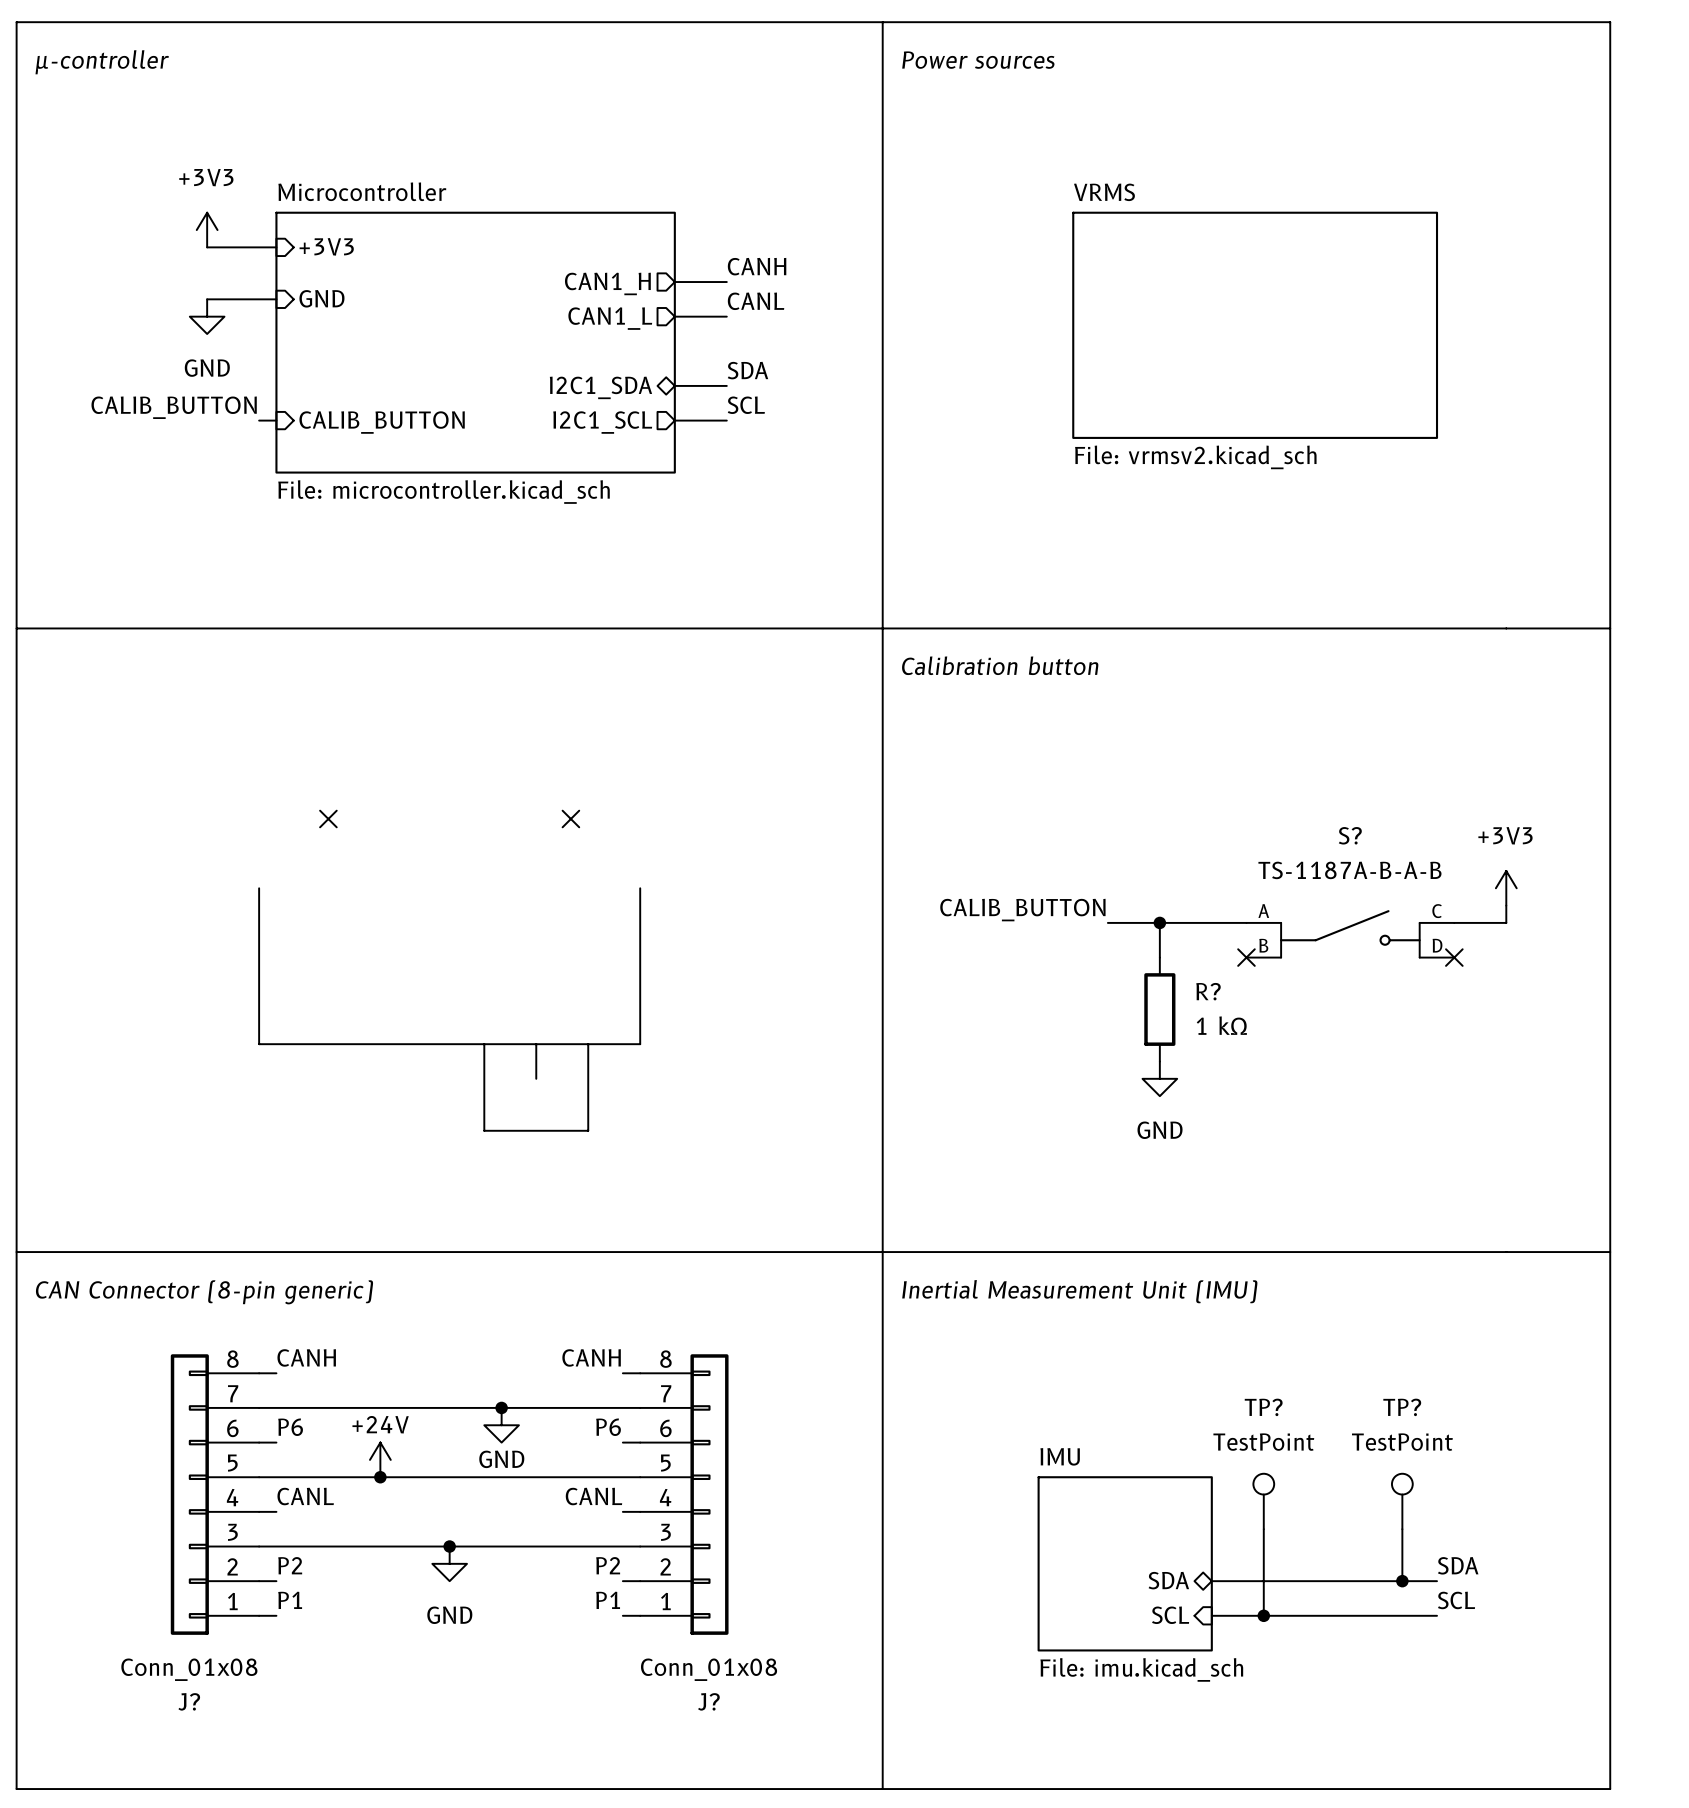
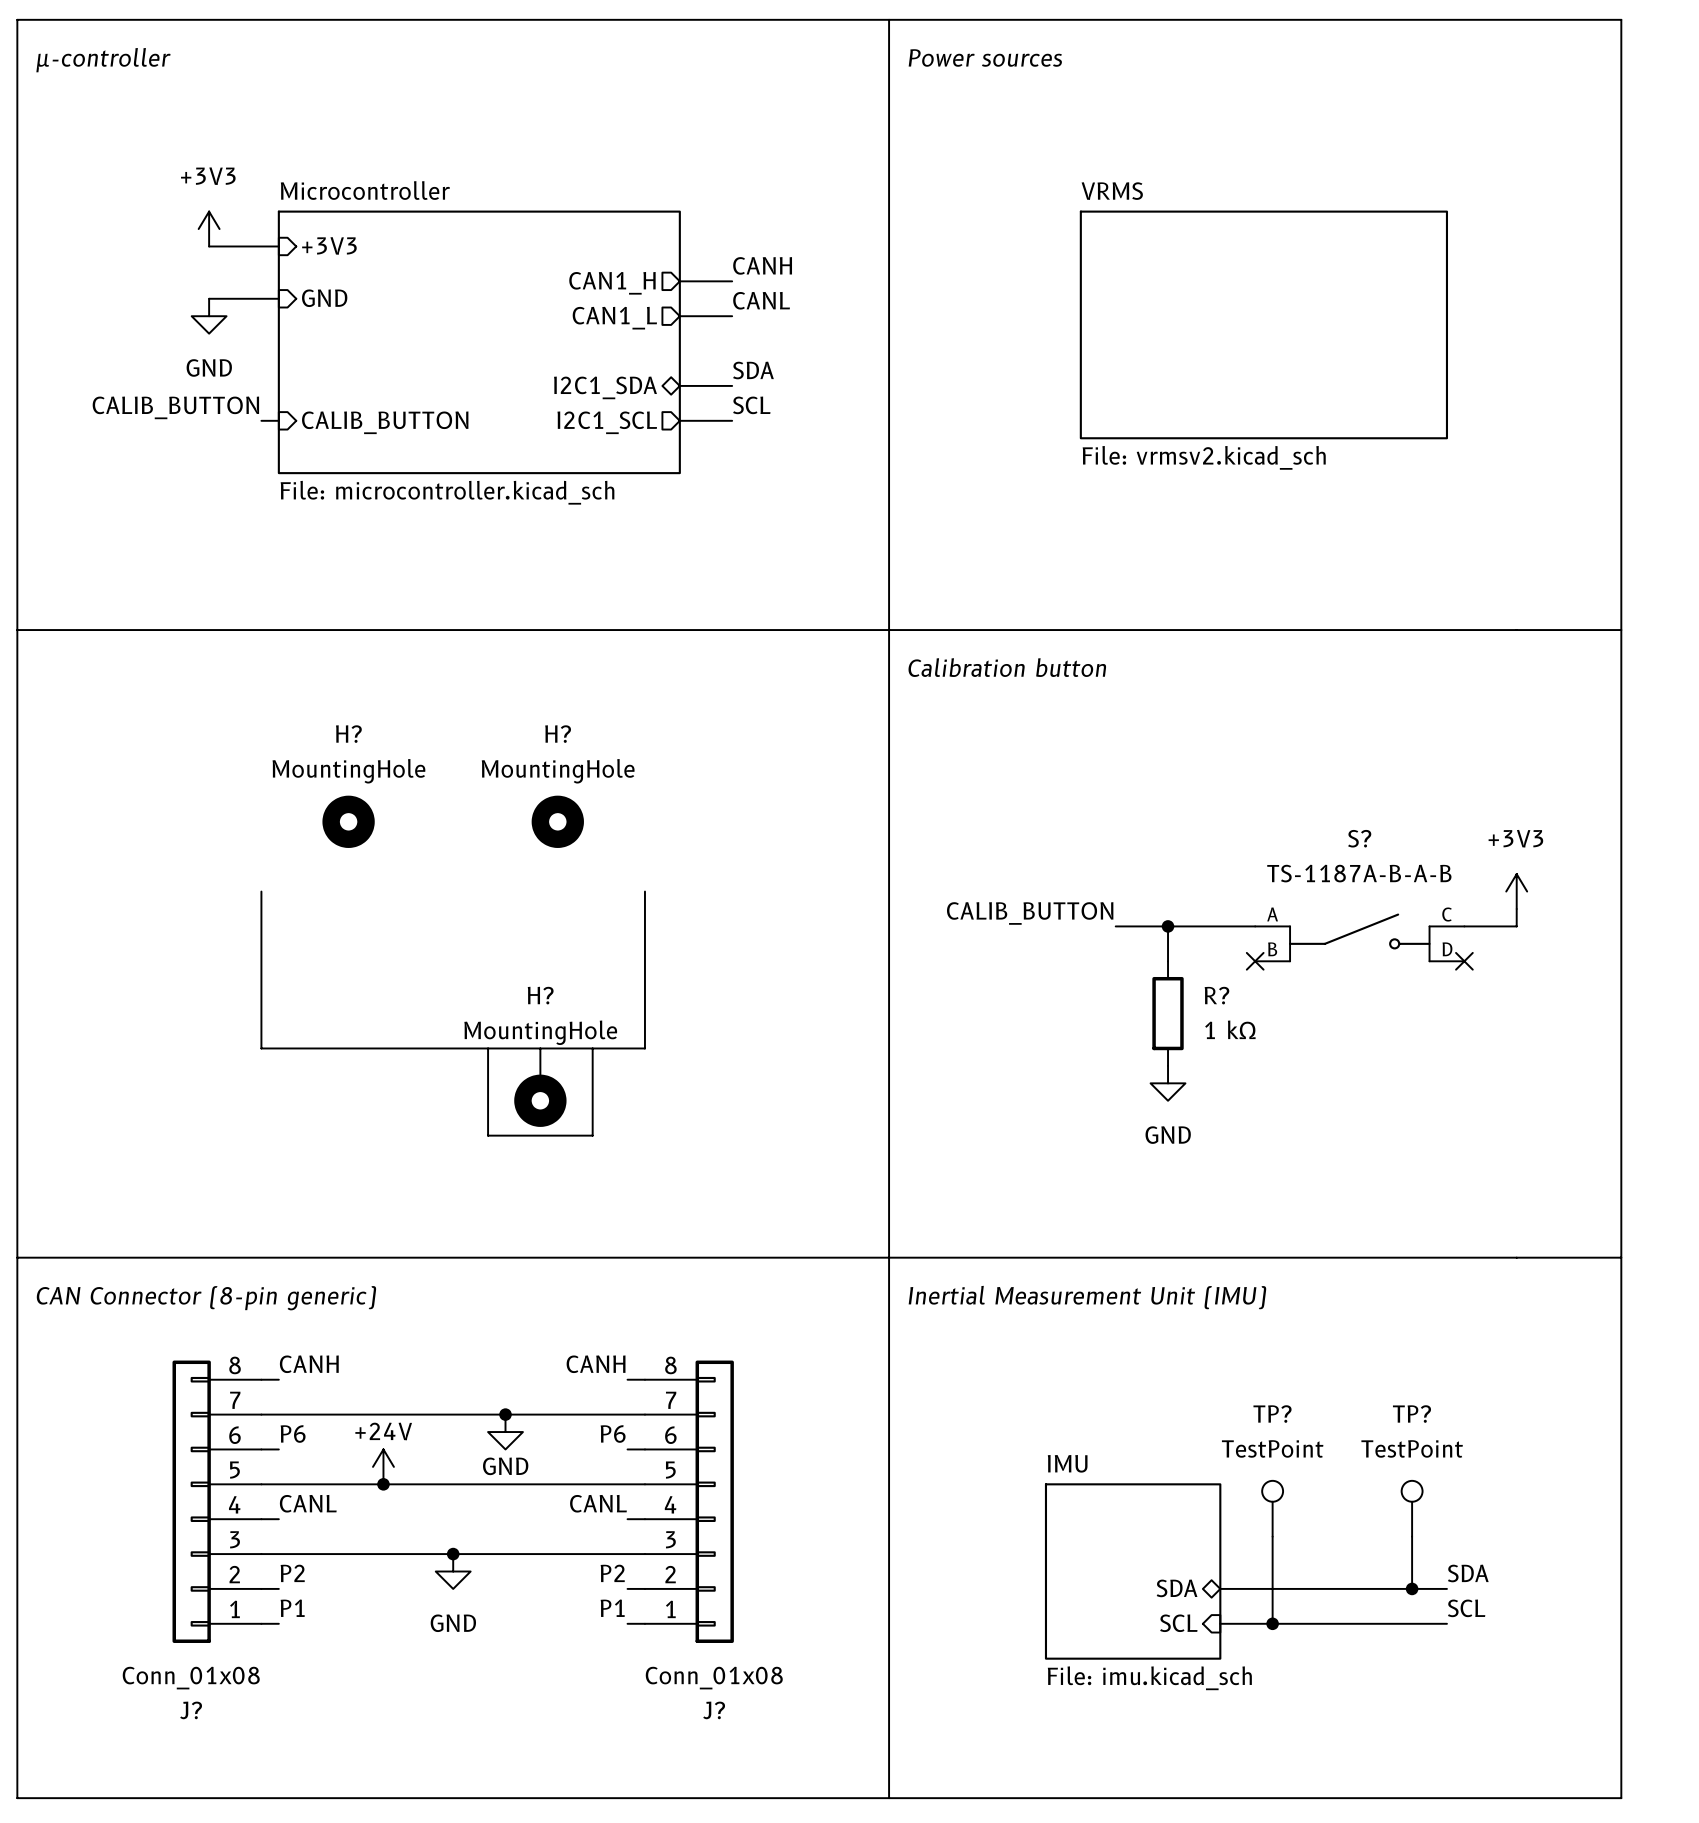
no-connect mark: (328, 818) -> none
H?: none -> MountingHole (348, 821)
H?: none -> MountingHole (557, 821)
no-connect mark: (570, 818) -> none
H?: none -> MountingHole (540, 1100)

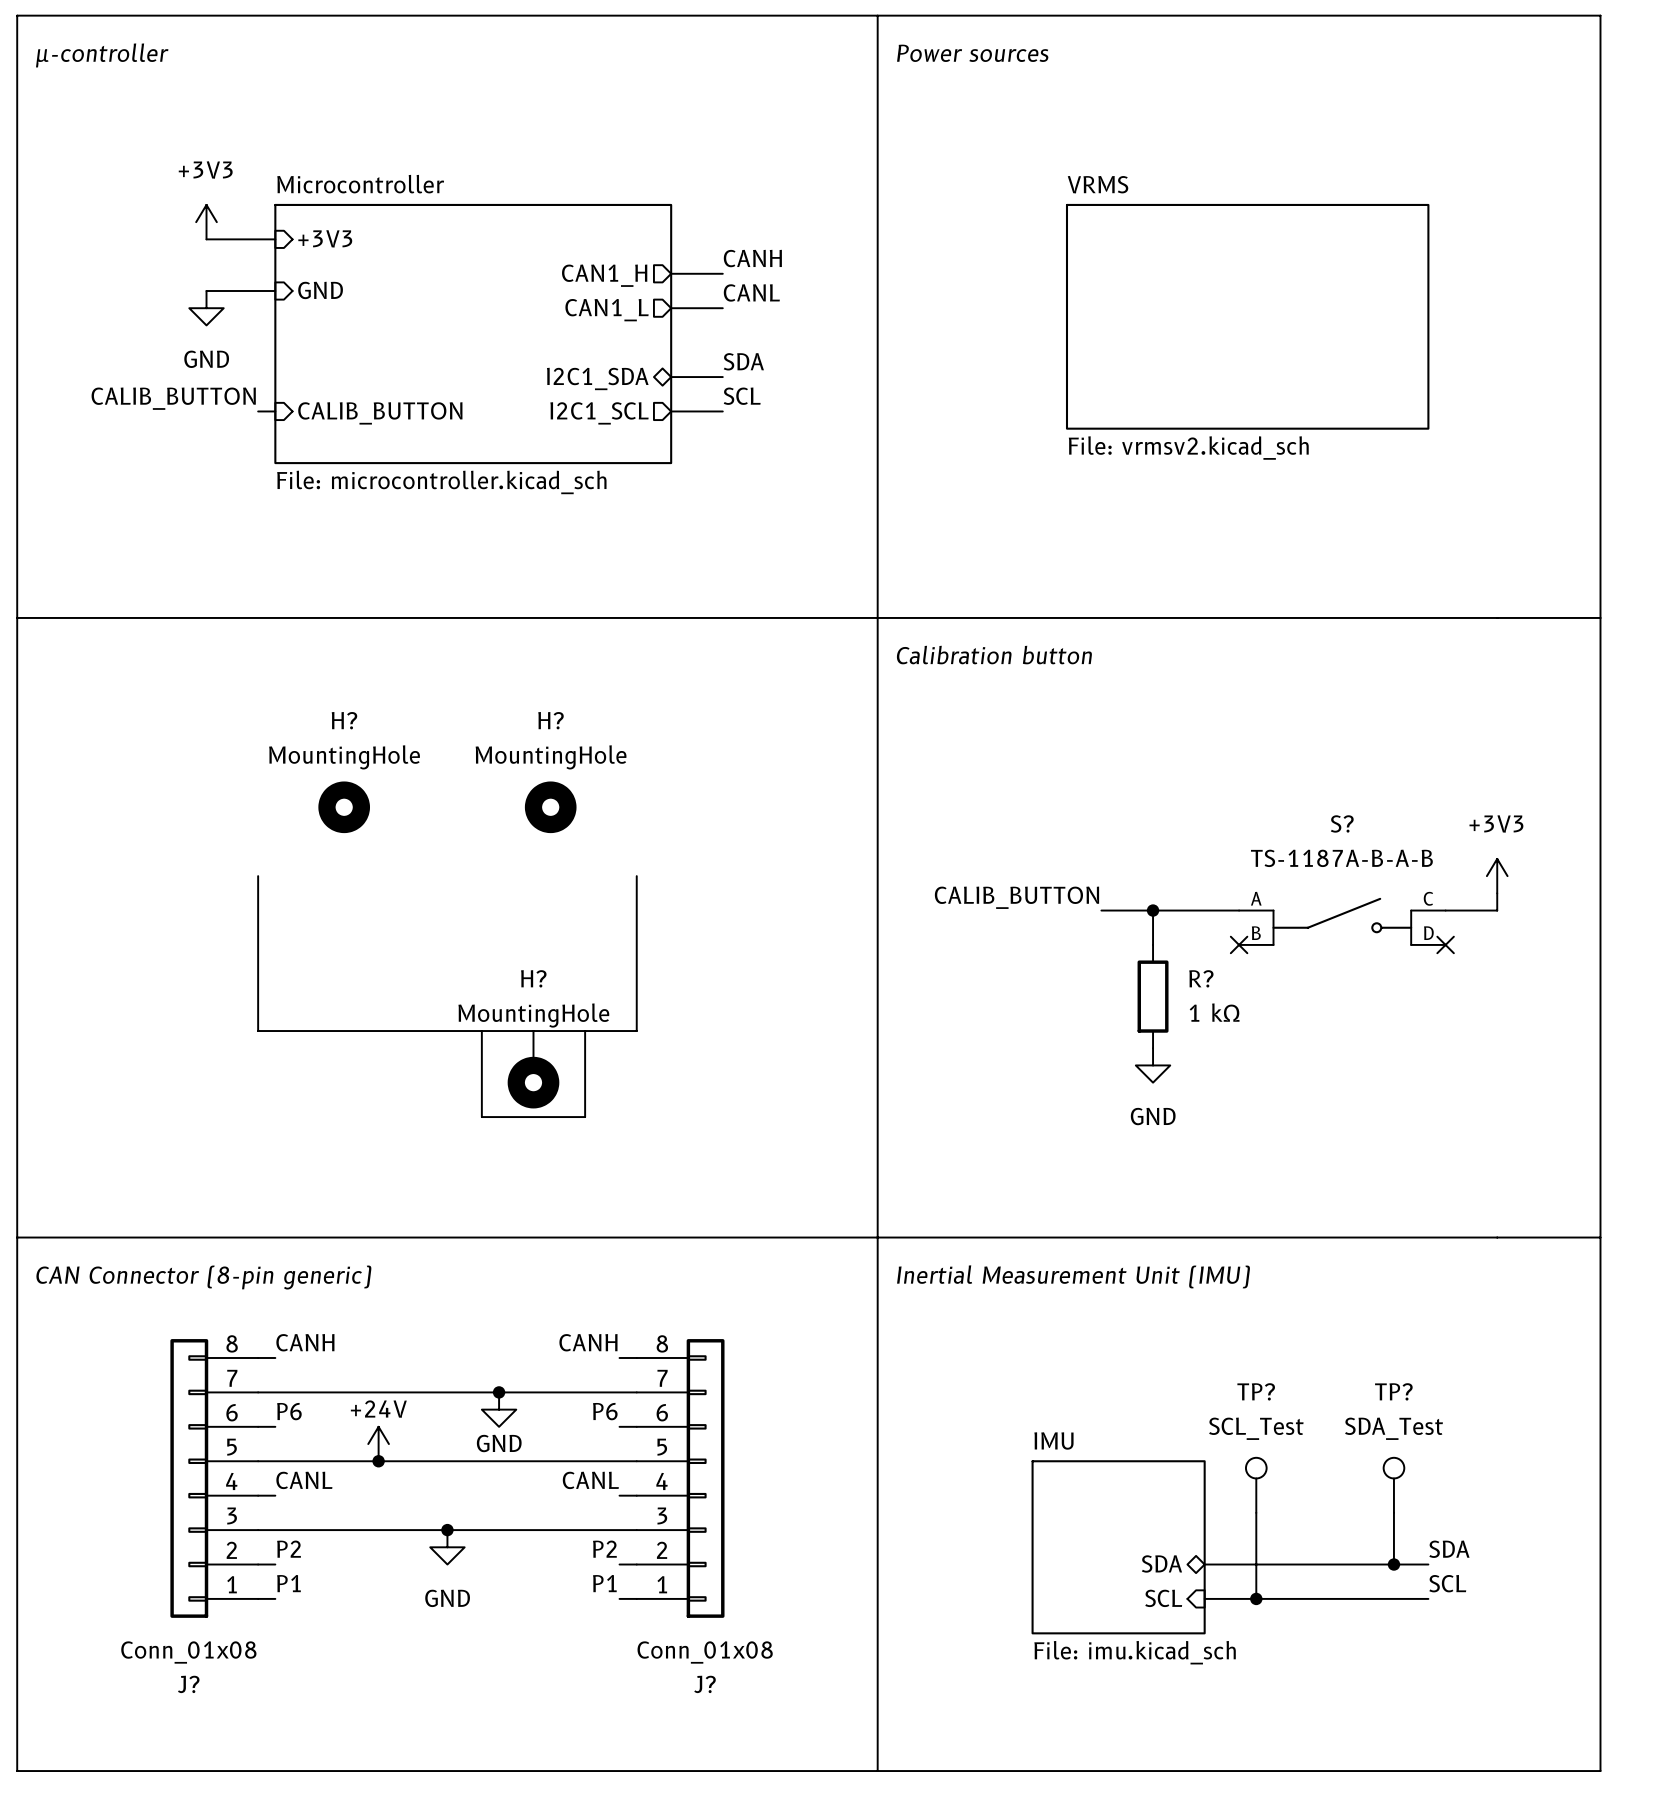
TP? value: TestPoint (1272, 1448) -> SCL_Test (1256, 1428)
TP? value: TestPoint (1412, 1448) -> SDA_Test (1394, 1428)

